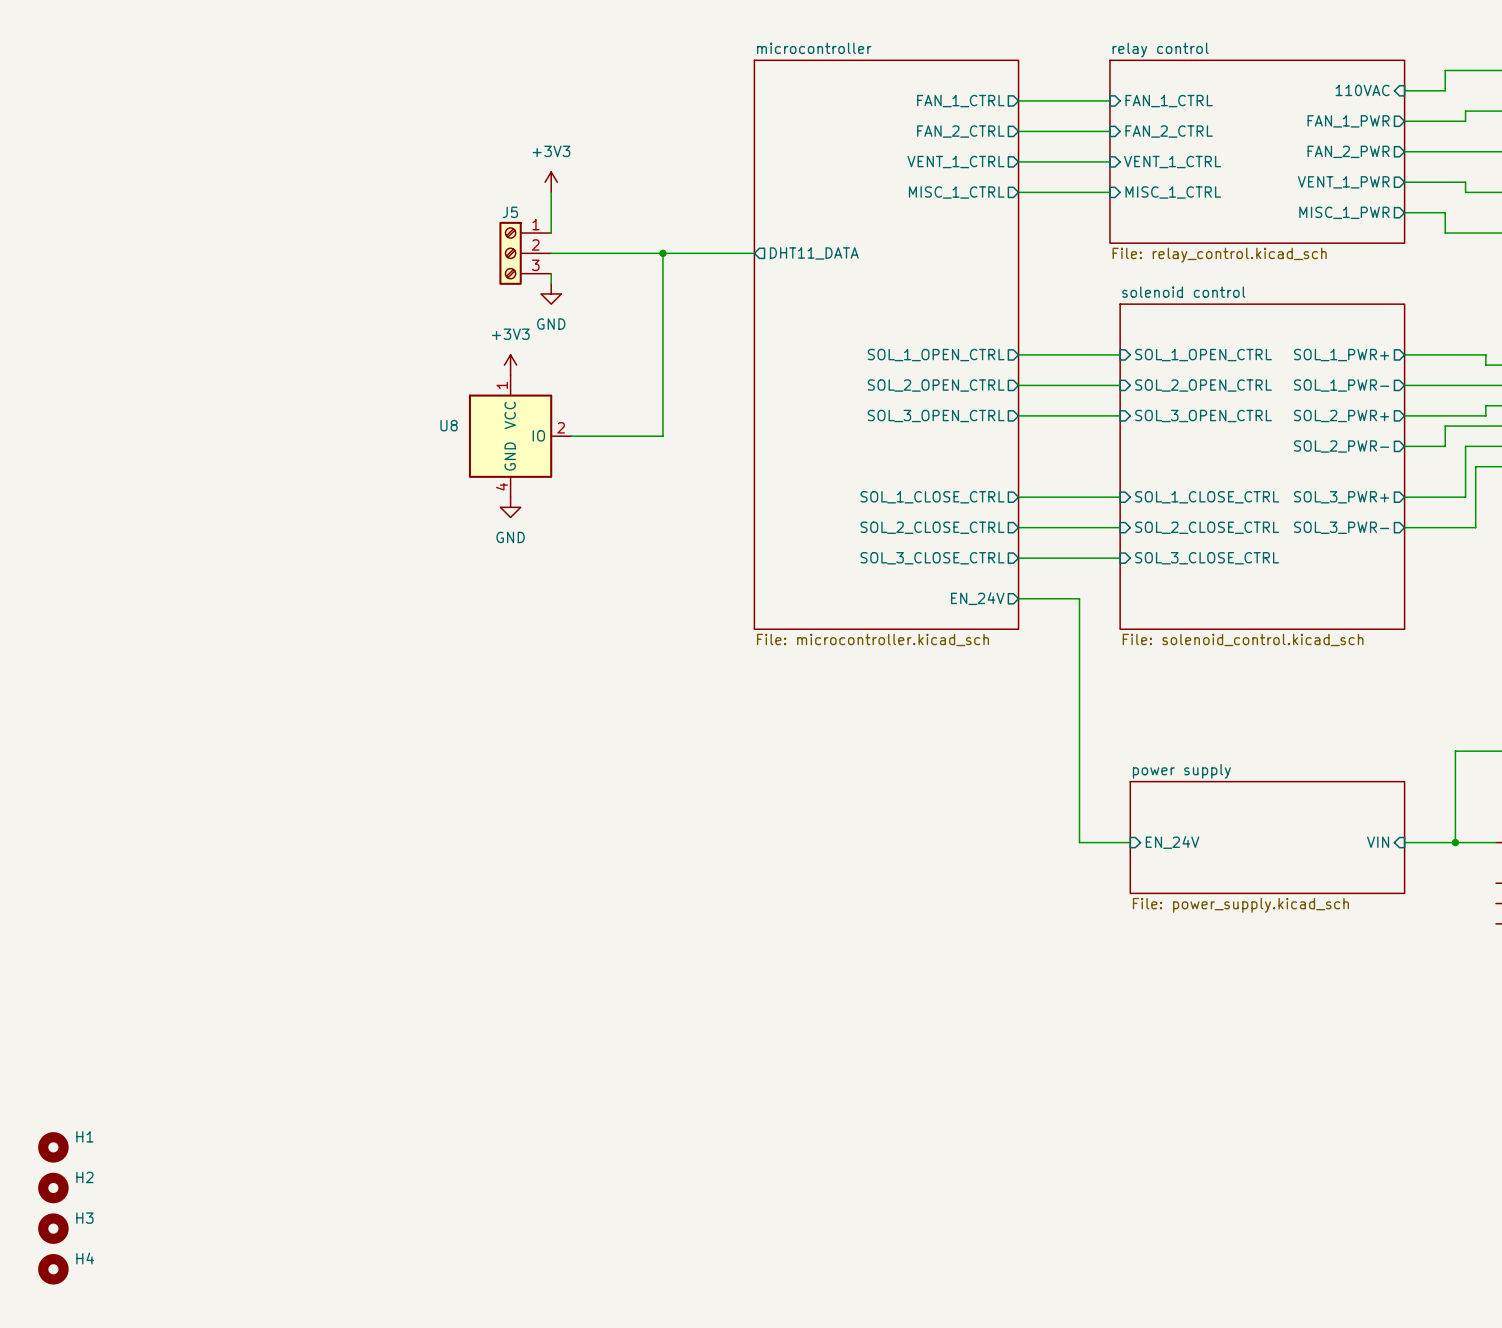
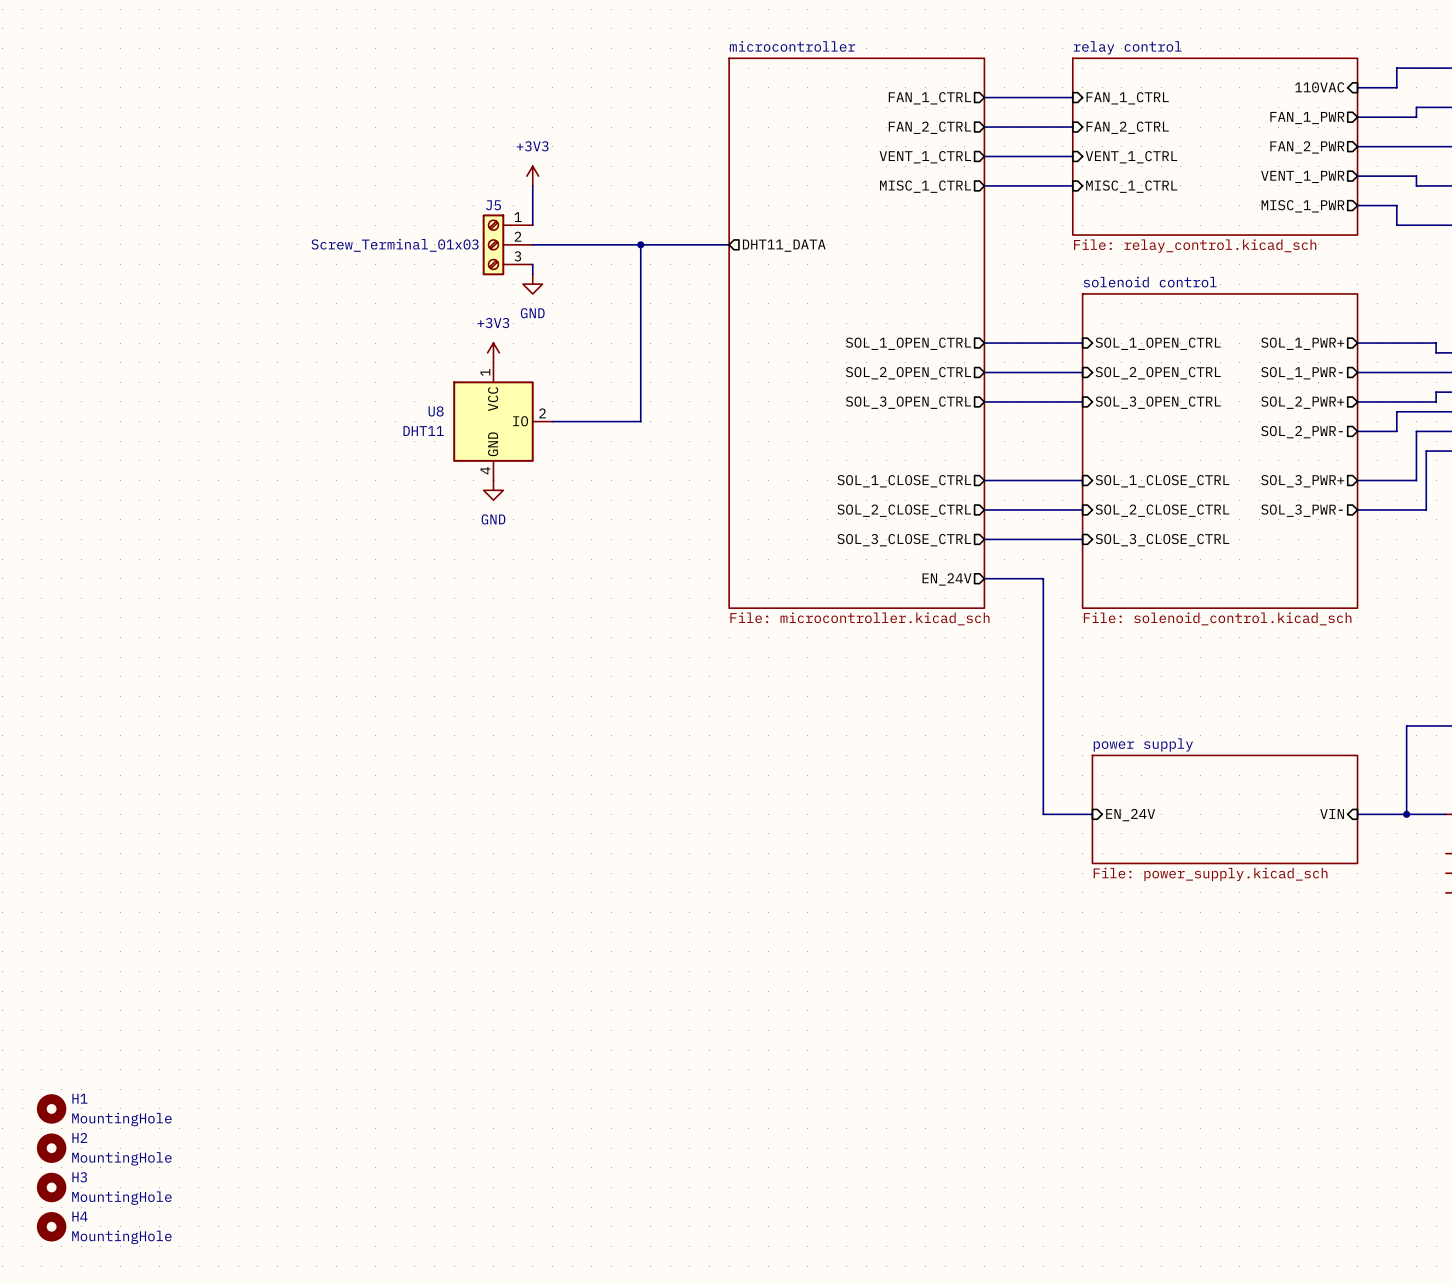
J5 value: none -> Screw_Terminal_01x03 (395, 245)
U8 value: none -> DHT11 (423, 431)
H1 value: none -> MountingHole (121, 1119)
H2 value: none -> MountingHole (121, 1158)
H3 value: none -> MountingHole (121, 1198)
H4 value: none -> MountingHole (121, 1237)

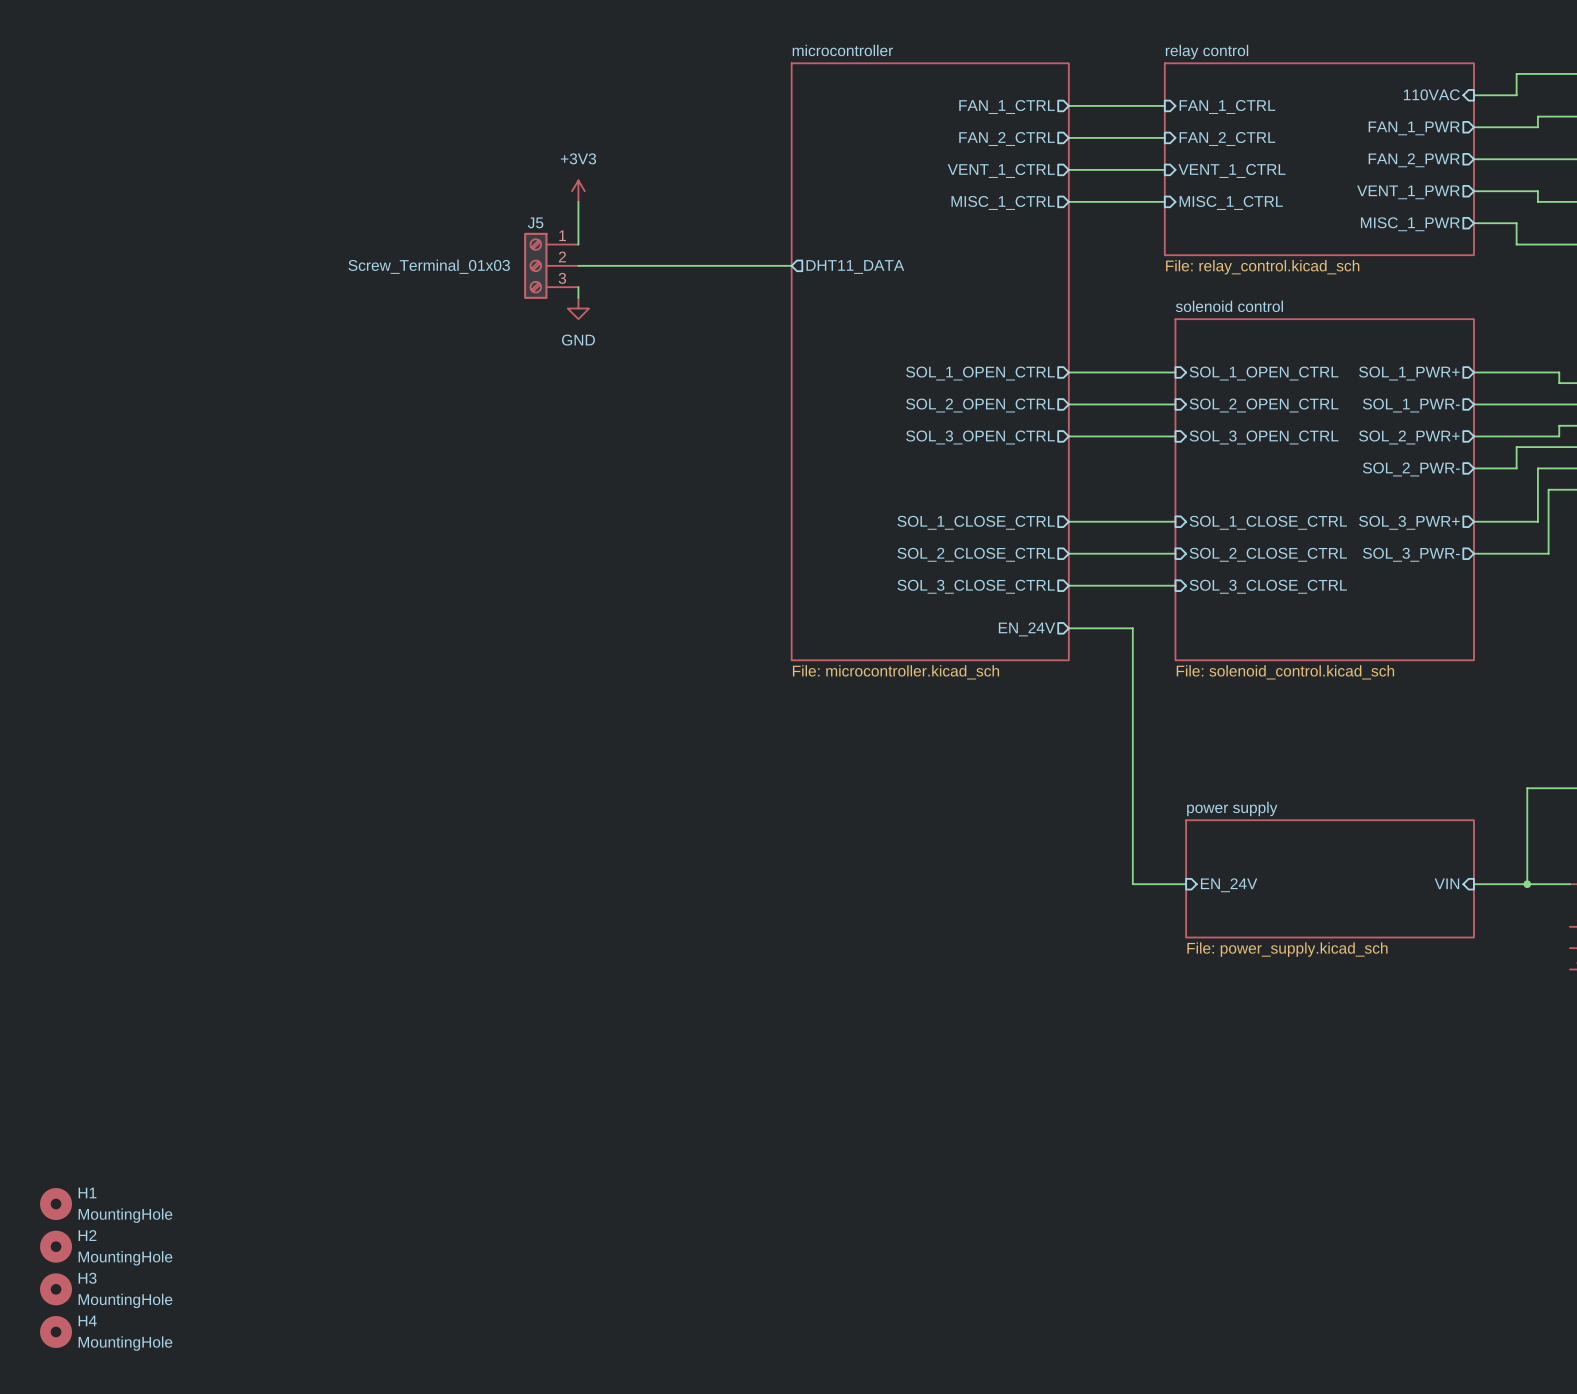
wire: (640, 244) (640, 421) (552, 421) -> none
junction: (640, 244) -> none
power symbol: +3V3 (493, 352) -> none
U8: DHT11 (502, 421) -> none
power symbol: GND (493, 490) -> none

